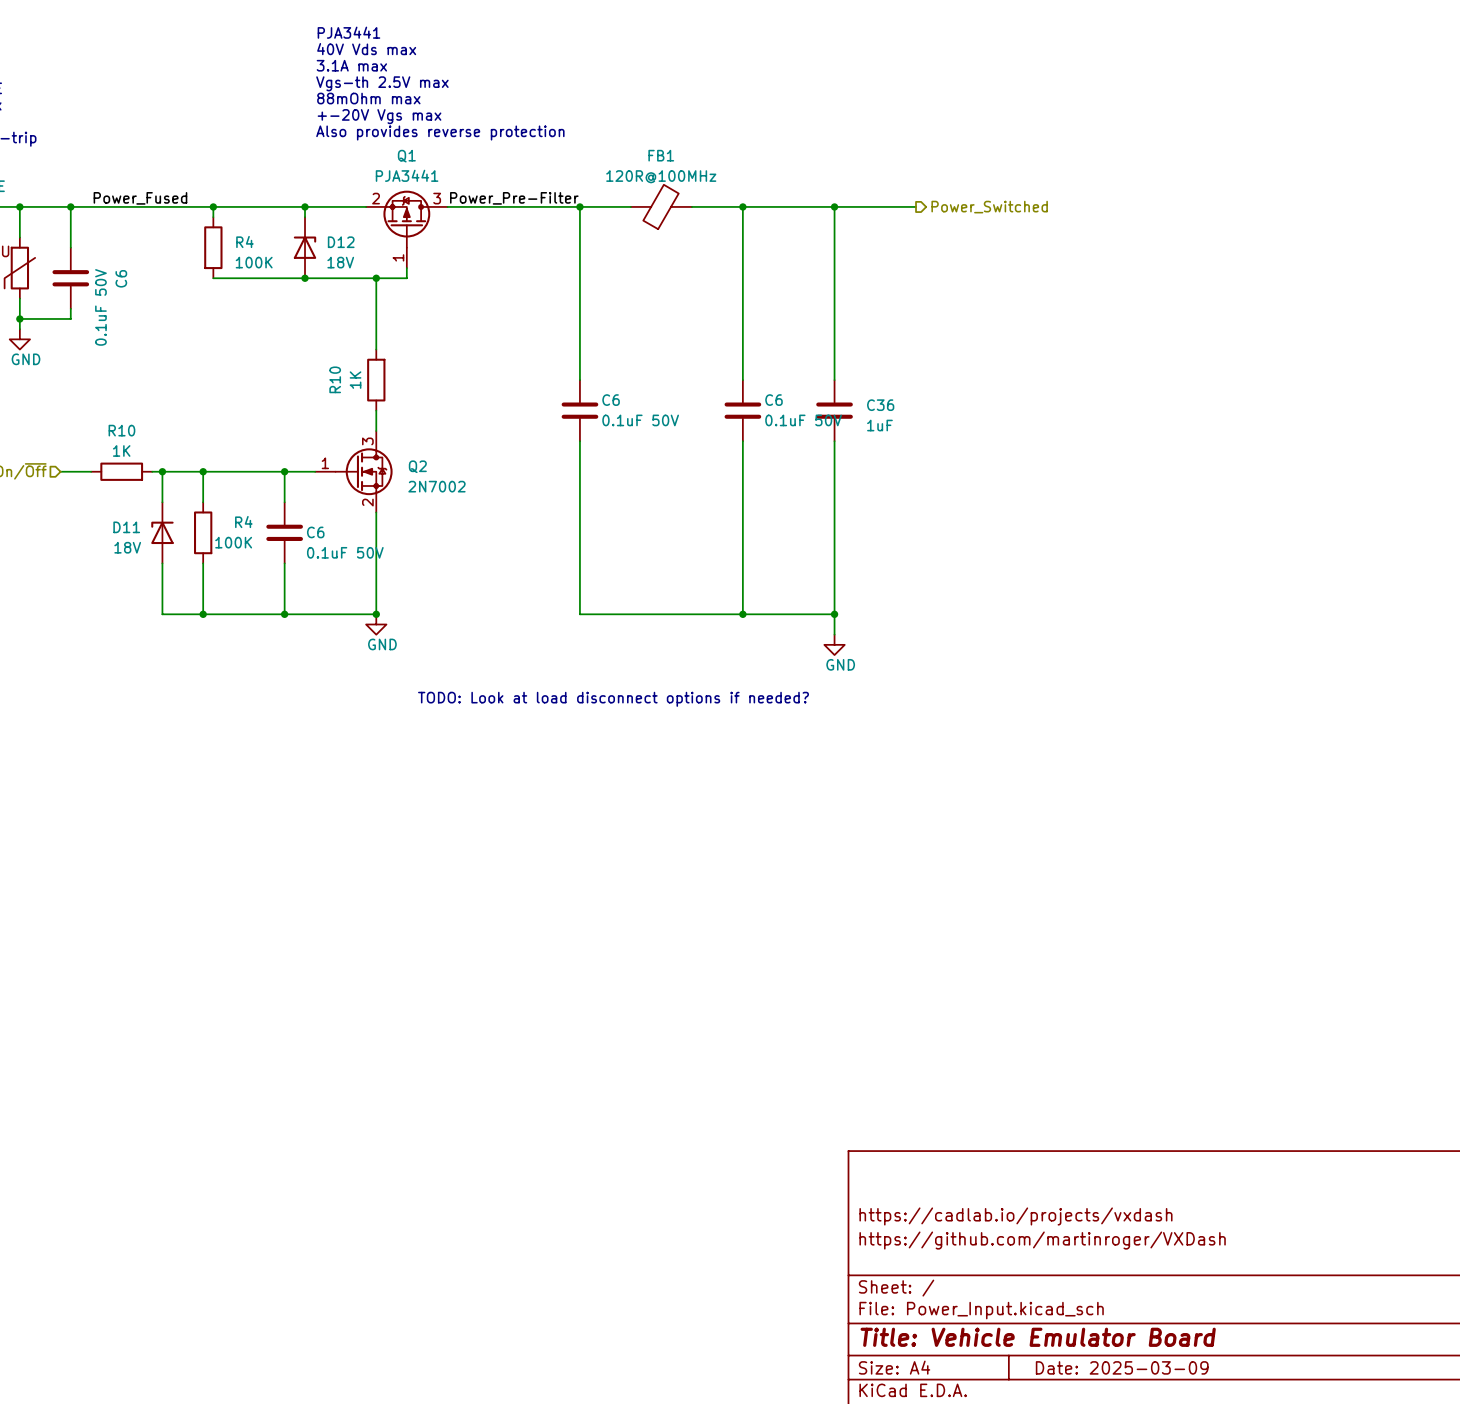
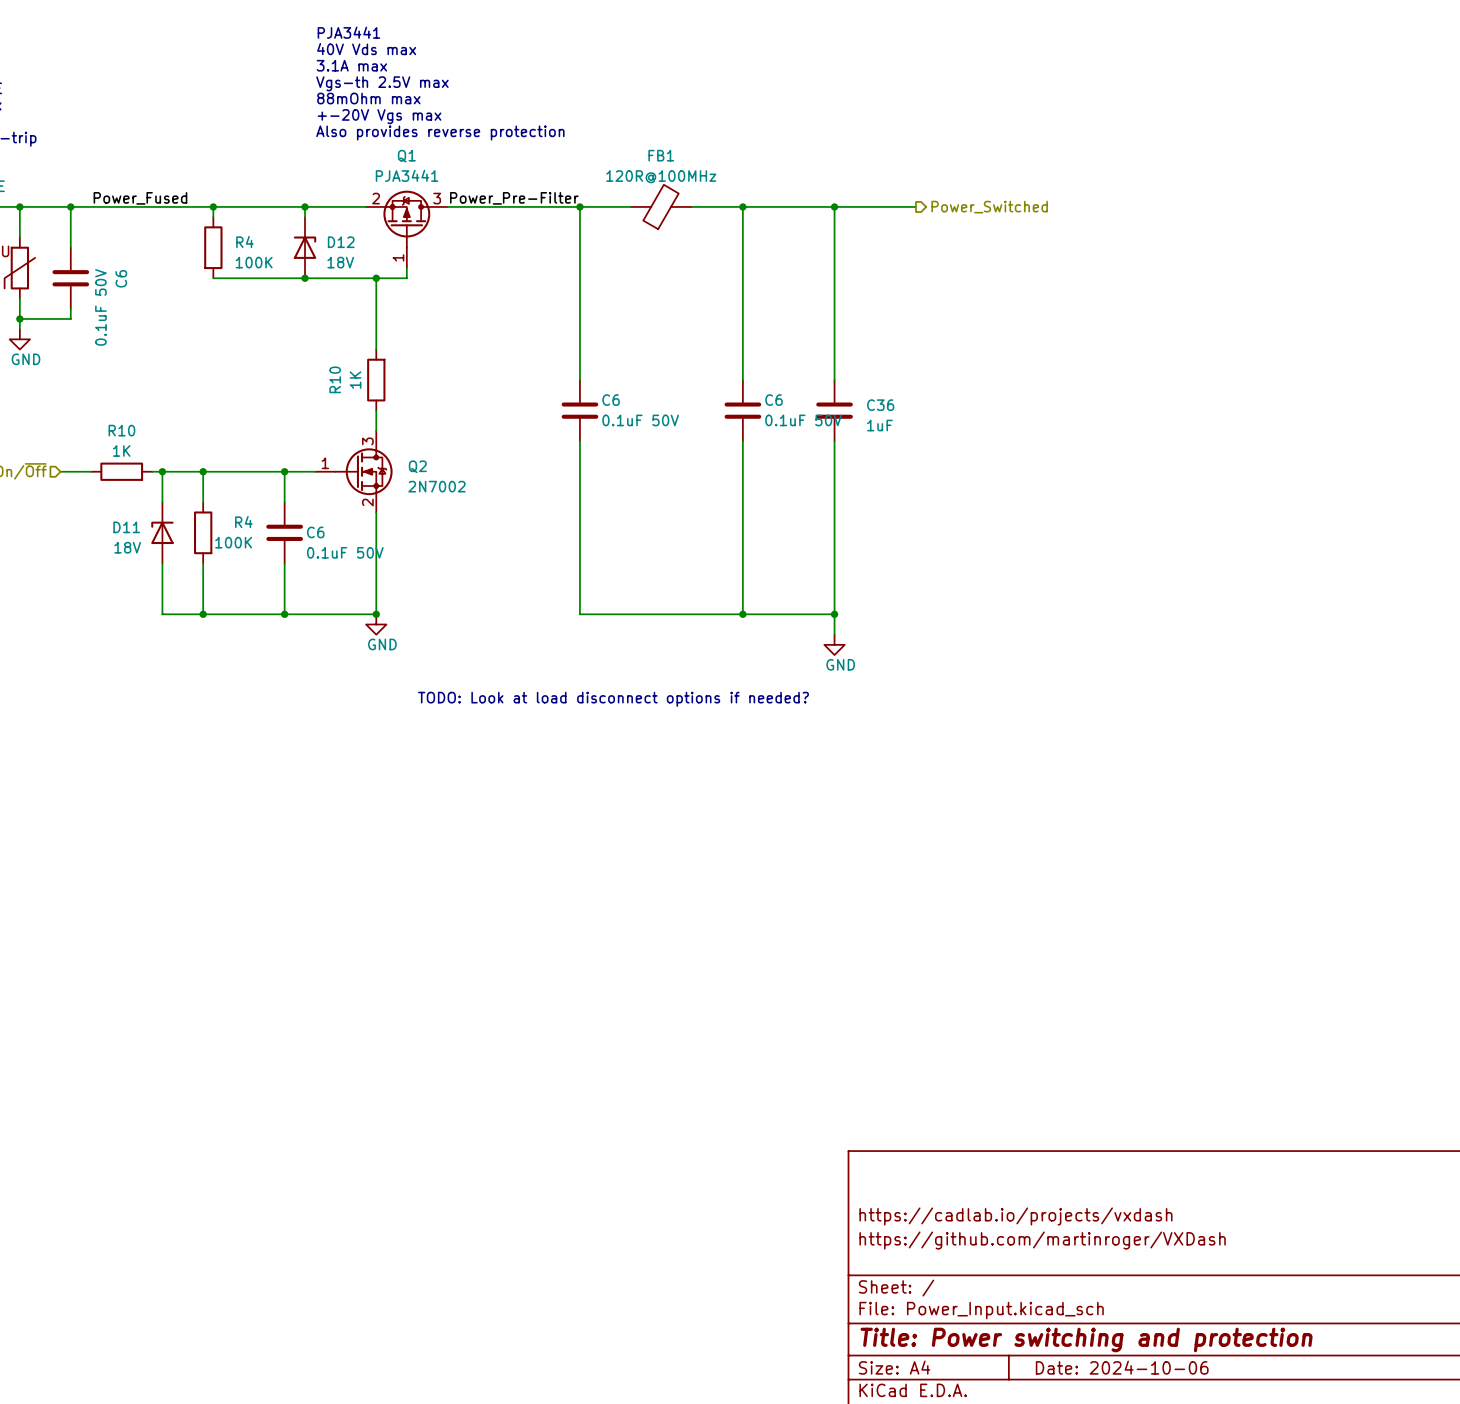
title block: Title: Vehicle Emulator Board (1038, 1337) -> Title: Power switching and protection (1086, 1339)
title block: Date: 2025-03-09 (1122, 1367) -> Date: 2024-10-06 (1122, 1367)

